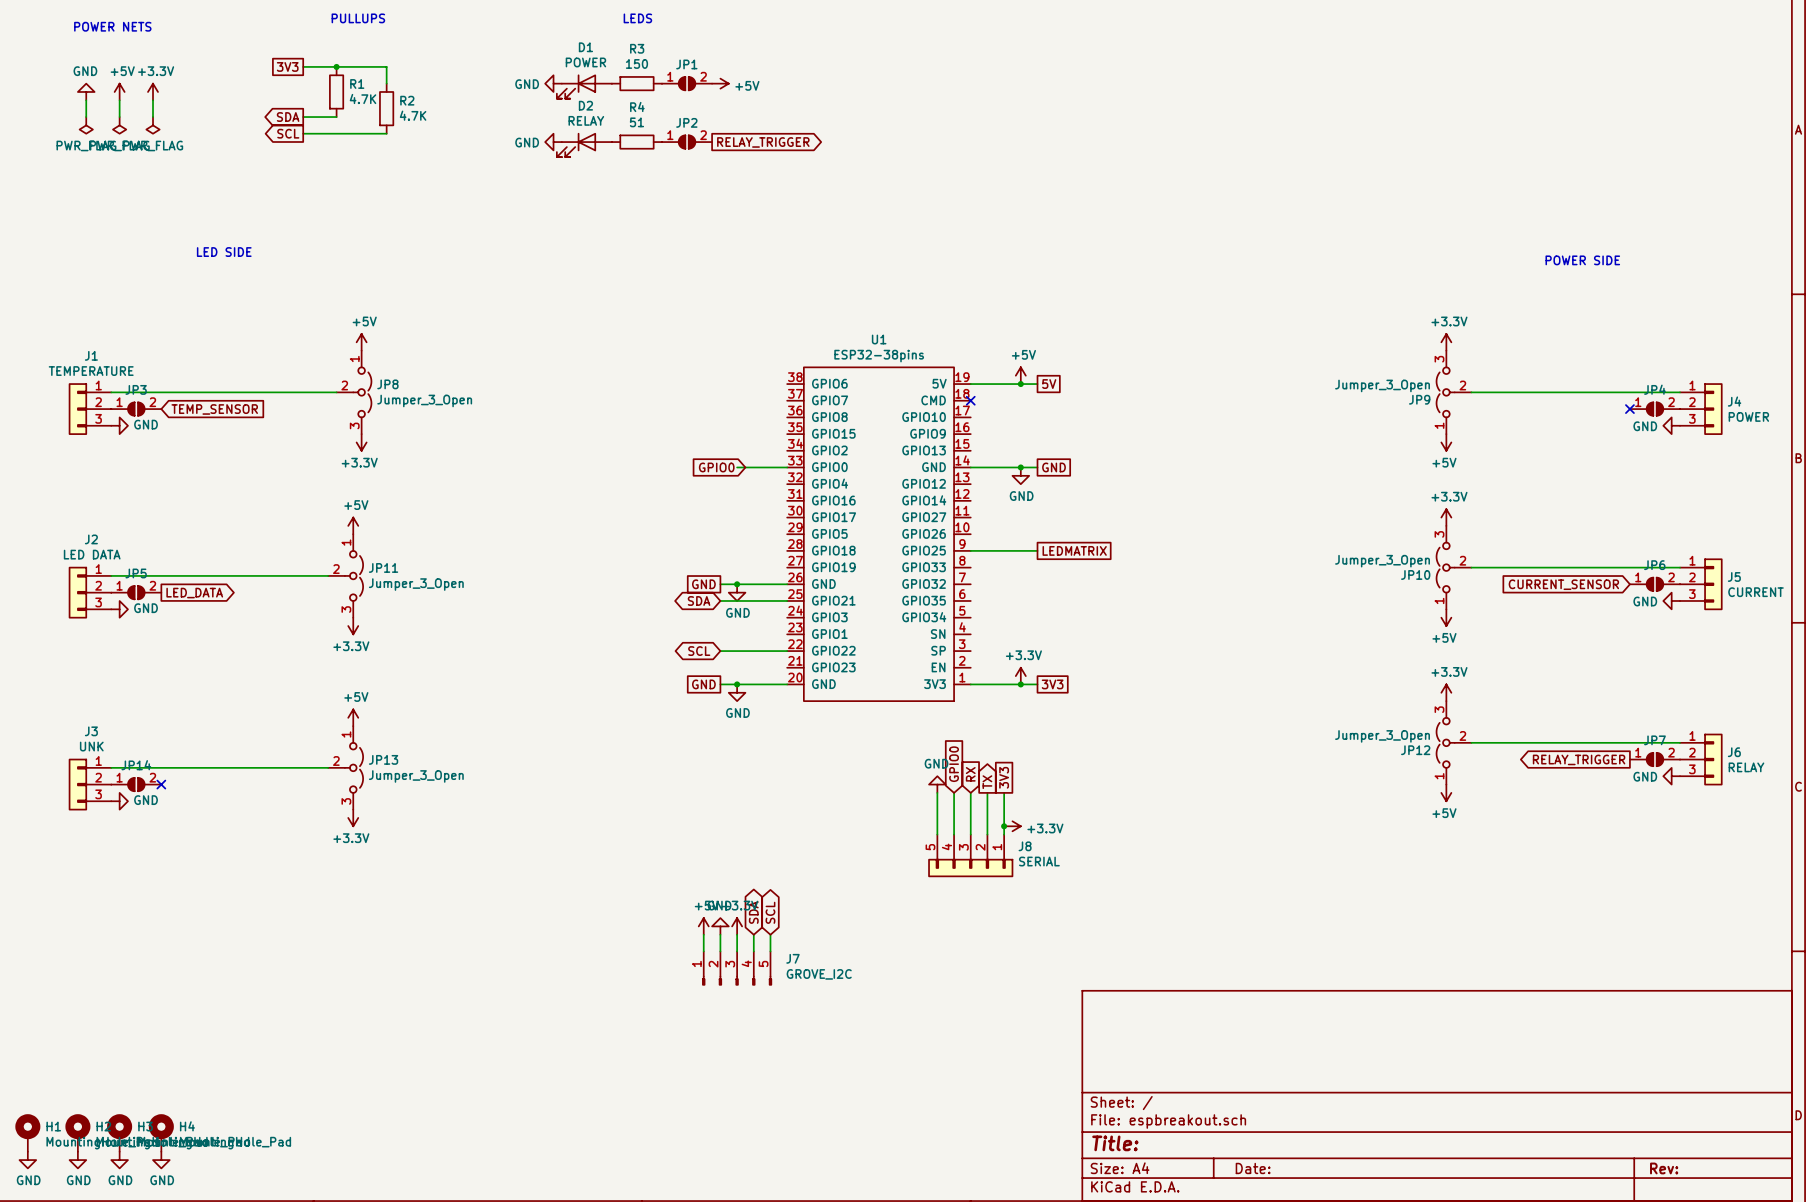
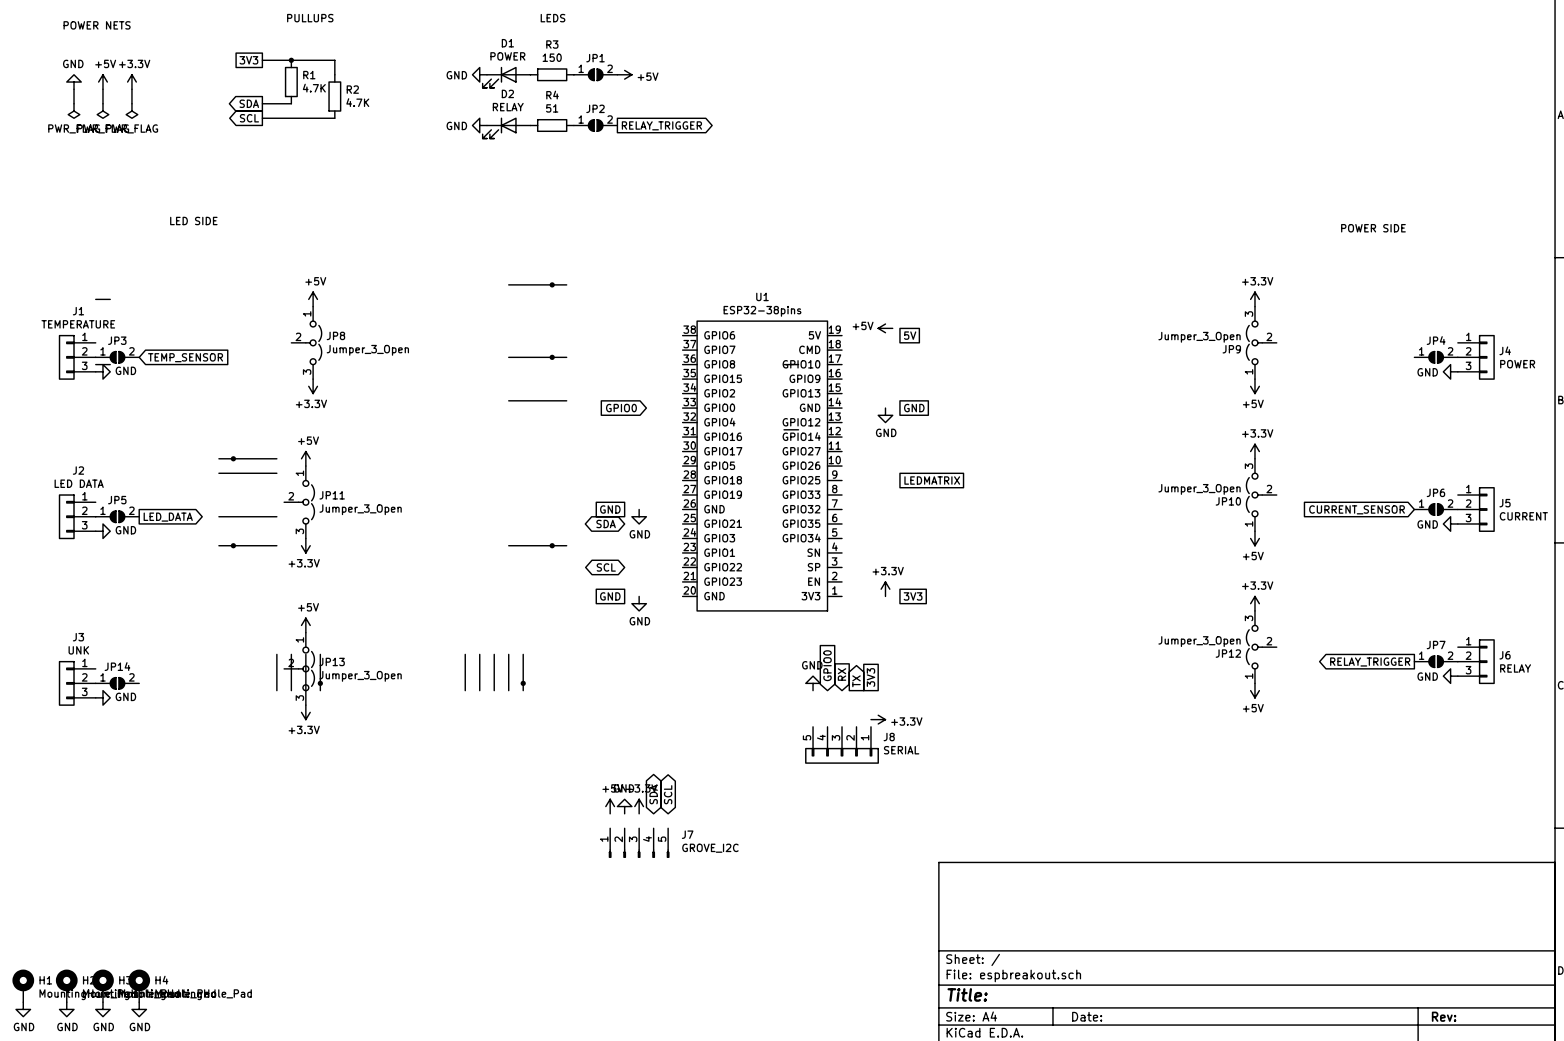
wire: none -> (508, 284) (566, 284)
junction: none -> (552, 284)
wire: none -> (95, 299) (110, 299)
power symbol rotation: 0° (1020, 375) -> 90° counterclockwise (885, 328)
wire: (970, 384) (1037, 384) -> none
junction: (1020, 384) -> none
wire: (111, 392) (336, 392) -> none
wire: (1471, 392) (1680, 392) -> none
no-connect mark: (970, 400) -> none
wire: none -> (508, 357) (566, 357)
junction: none -> (552, 357)
no-connect mark: (1629, 409) -> none
wire: none -> (95, 364) (110, 364)
wire: none -> (784, 364) (798, 364)
wire: none -> (508, 400) (566, 400)
wire: (737, 467) (787, 467) -> none
wire: (970, 467) (1037, 467) -> none
junction: (1020, 467) -> none
wire: none -> (784, 429) (798, 429)
wire: none -> (218, 458) (276, 458)
junction: none -> (233, 458)
wire: none -> (218, 473) (276, 473)
wire: (970, 550) (1037, 550) -> none
wire: (1471, 567) (1680, 567) -> none
wire: (111, 575) (328, 575) -> none
wire: (720, 584) (787, 584) -> none
junction: (737, 584) -> none
wire: none -> (218, 516) (276, 516)
wire: (720, 600) (787, 600) -> (508, 545) (566, 545)
wire: none -> (218, 545) (276, 545)
junction: none -> (233, 545)
junction: none -> (552, 545)
wire: (720, 651) (787, 651) -> none
wire: (720, 684) (787, 684) -> none
junction: (737, 684) -> none
wire: (970, 684) (1037, 684) -> none
junction: (1020, 684) -> none
wire: (1471, 742) (1680, 742) -> none
wire: none -> (276, 654) (276, 690)
wire: none -> (291, 654) (291, 690)
wire: none -> (305, 654) (305, 690)
wire: none -> (320, 654) (320, 690)
wire: none -> (465, 654) (465, 690)
wire: none -> (479, 654) (479, 690)
wire: none -> (494, 654) (494, 690)
wire: none -> (508, 654) (508, 690)
wire: none -> (523, 654) (523, 690)
wire: (111, 767) (328, 767) -> none
no-connect mark: (161, 784) -> none
junction: none -> (320, 683)
junction: none -> (523, 683)
wire: (937, 792) (937, 834) -> none
wire: (954, 792) (954, 834) -> none
wire: (970, 792) (970, 834) -> none
wire: (987, 792) (987, 834) -> none
wire: (1004, 792) (1004, 834) -> none
junction: (1004, 826) -> none
wire: (703, 934) (703, 951) -> none
wire: (720, 934) (720, 951) -> none
wire: (737, 934) (737, 951) -> none
wire: (753, 934) (753, 951) -> none
wire: (770, 934) (770, 951) -> none

